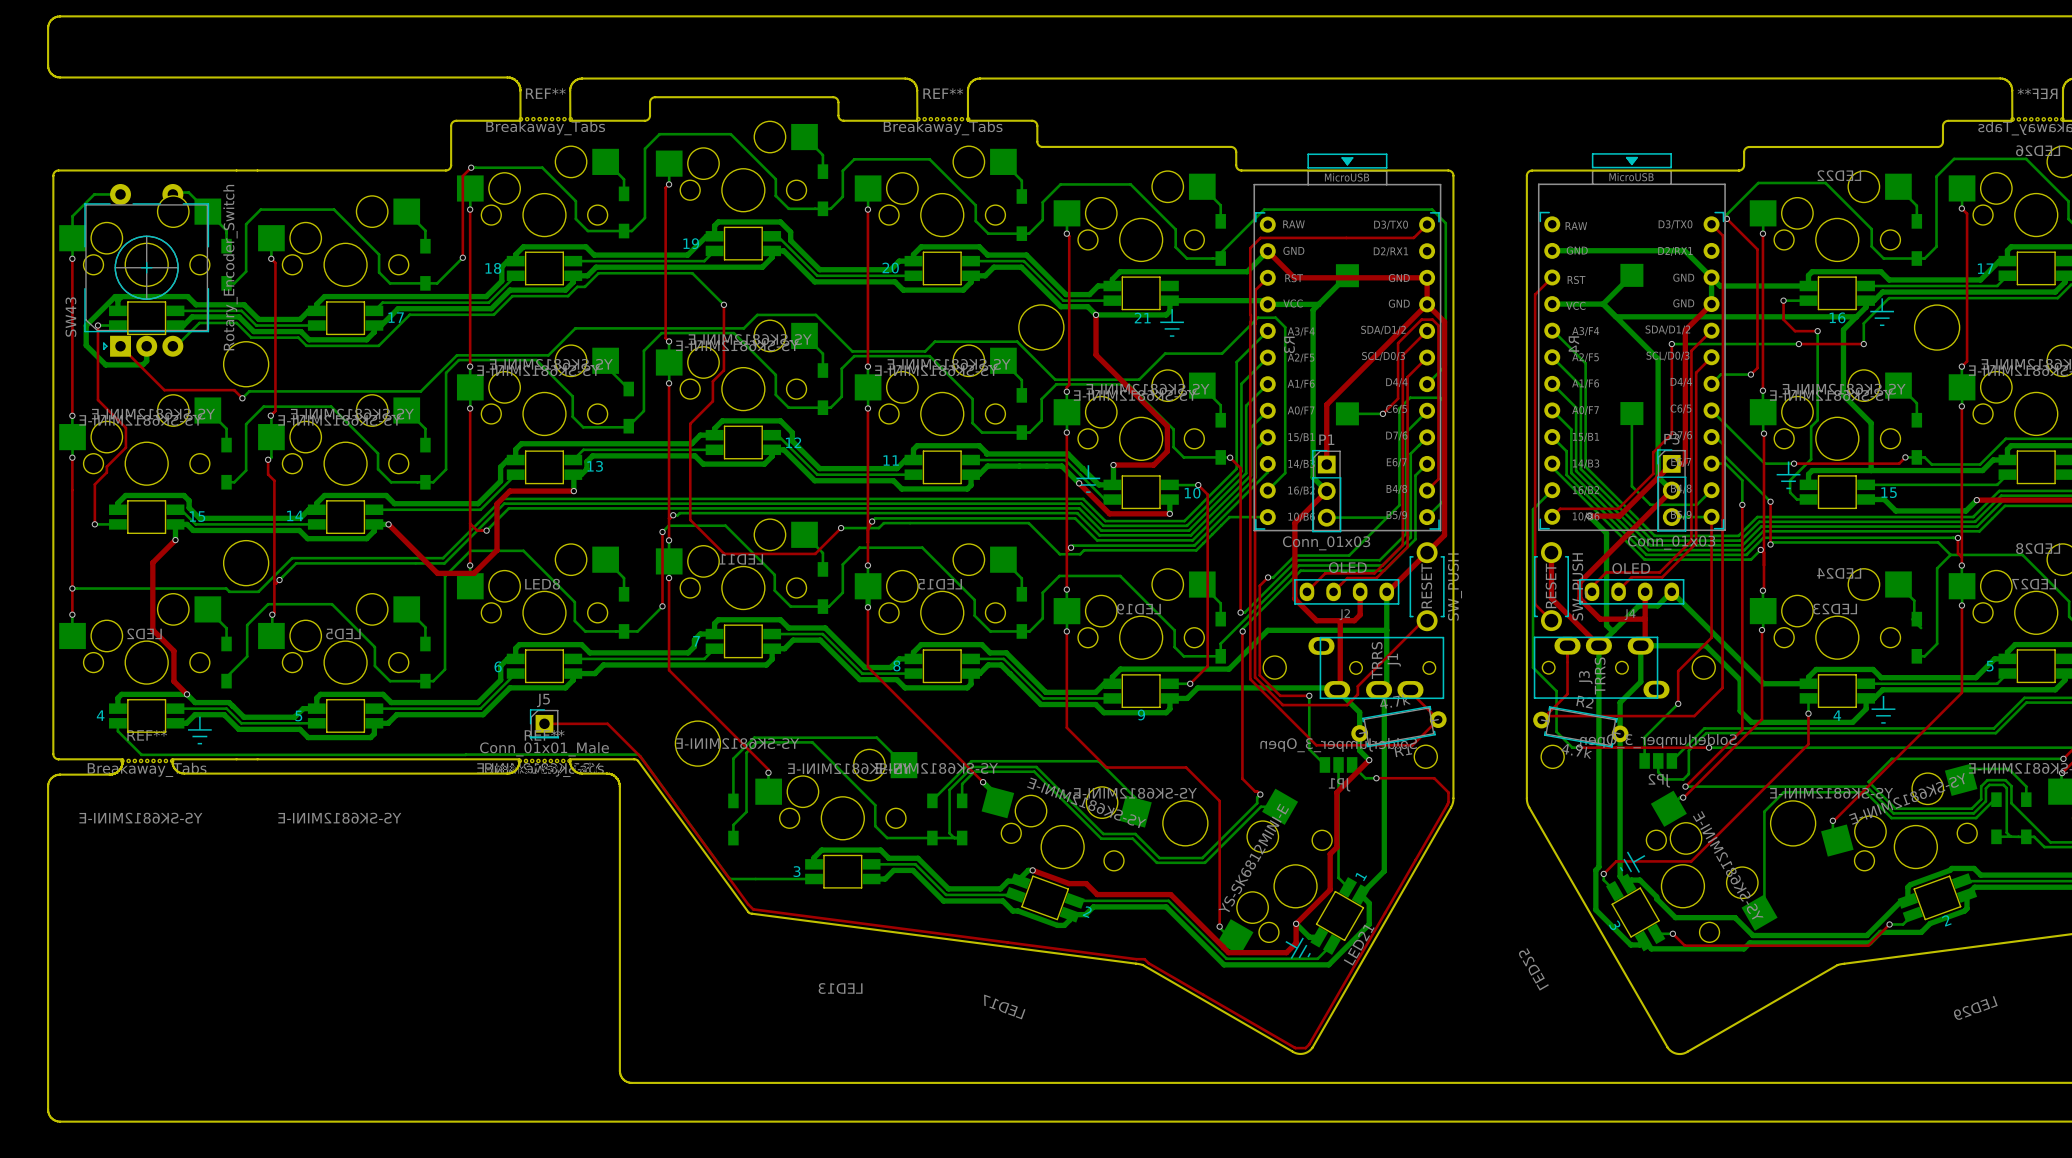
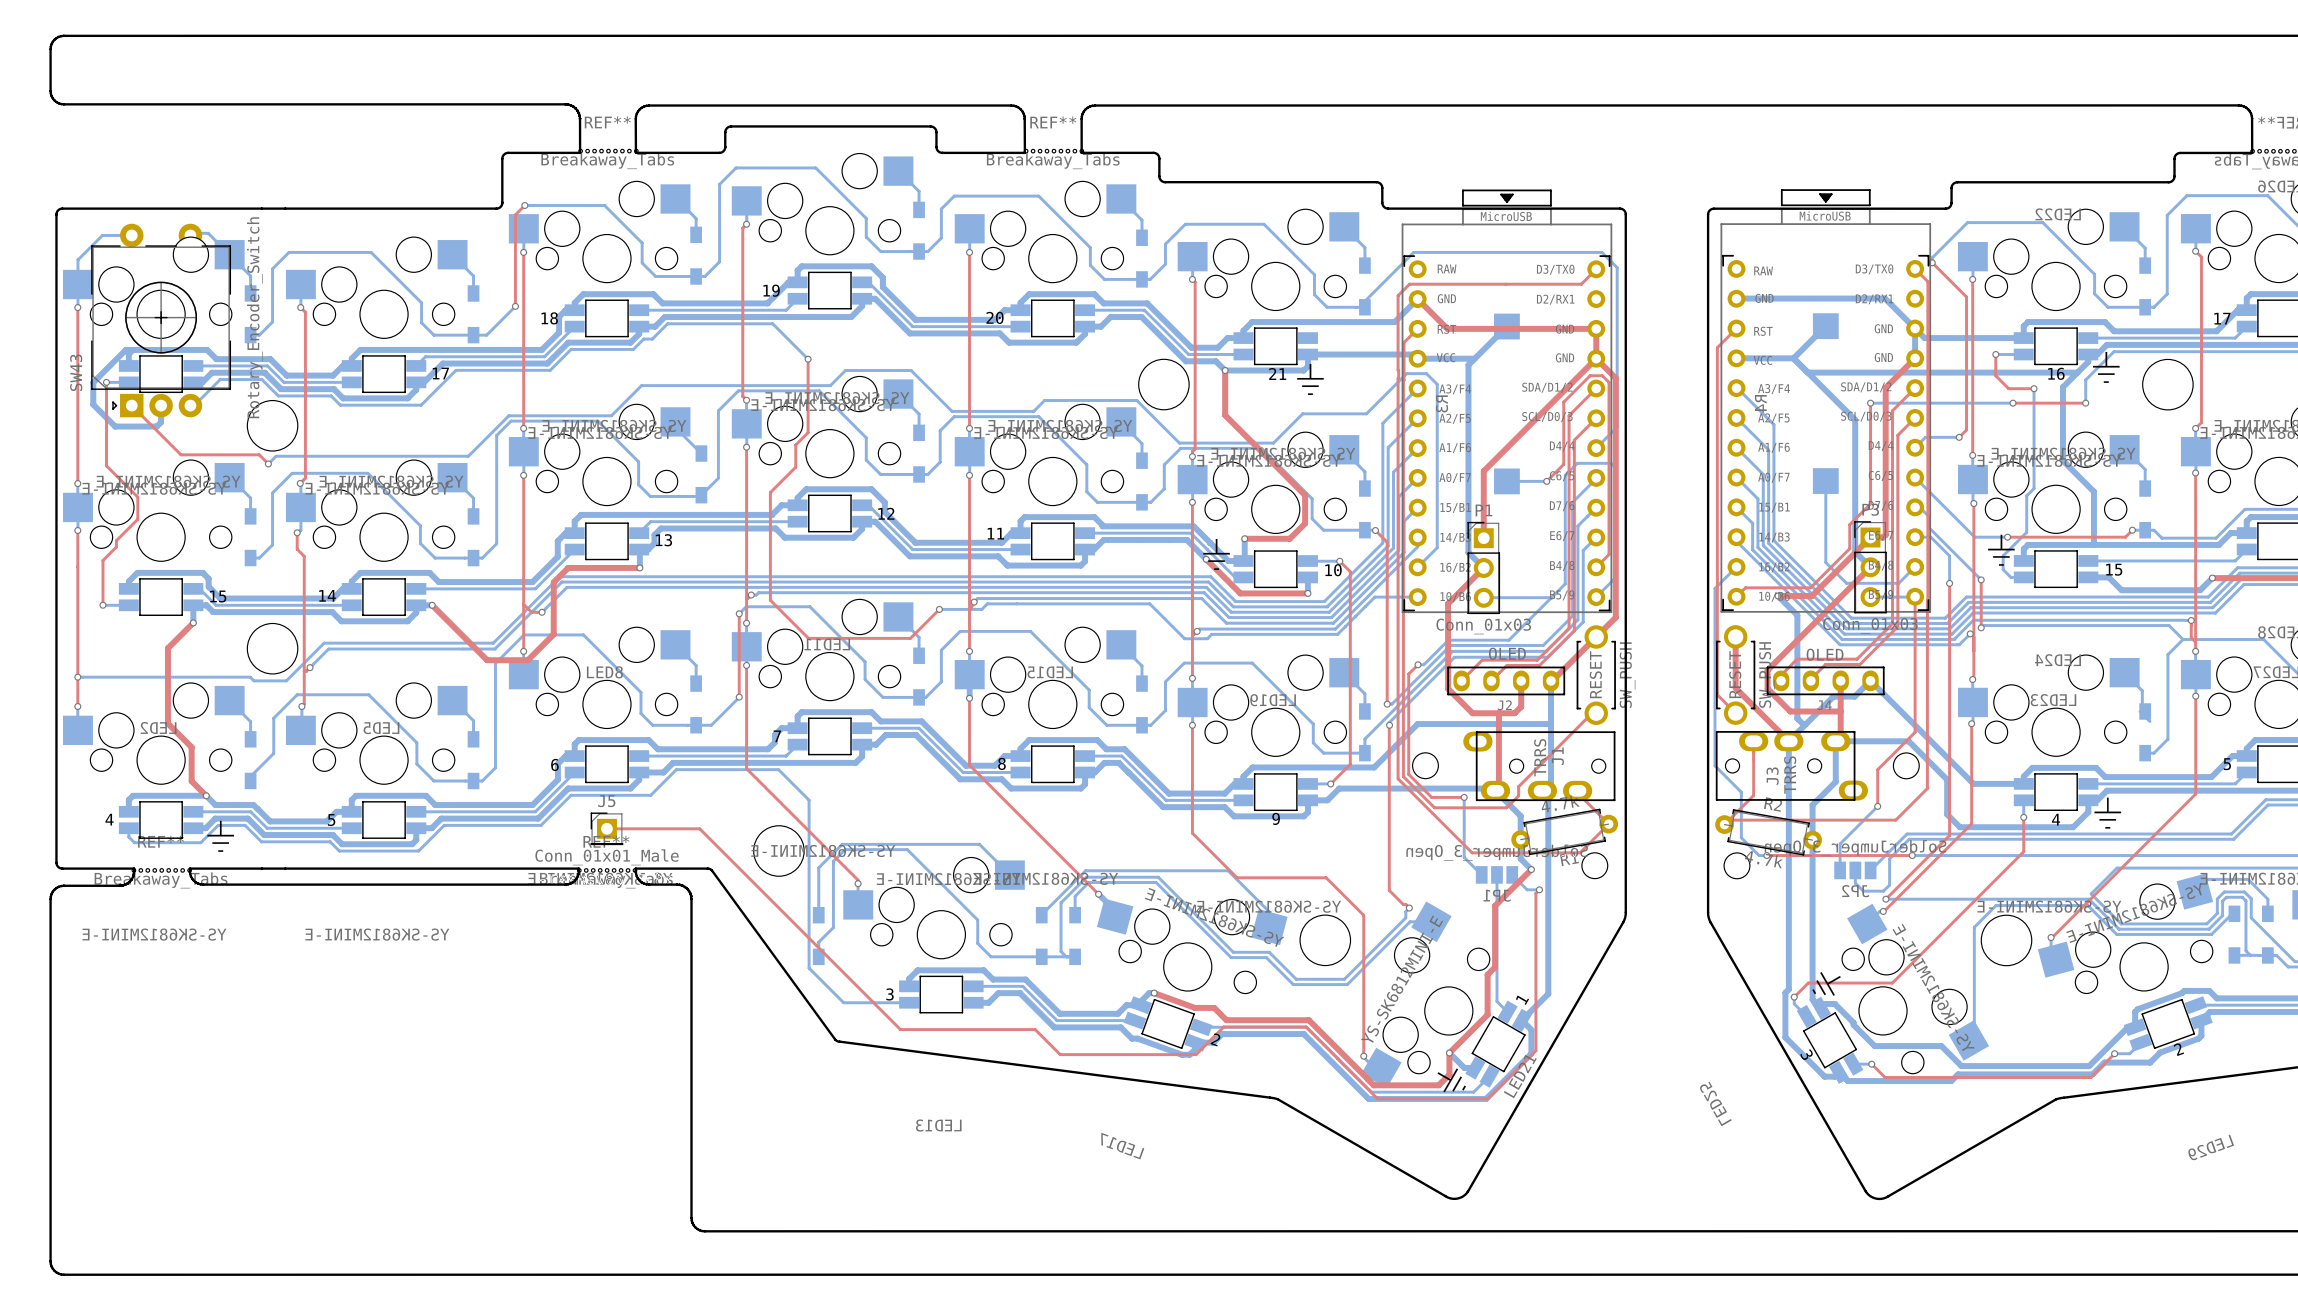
top track: (607, 723) (640, 756) (753, 909) (1144, 959) (1295, 1048) (1305, 1048) (1309, 1044) (1448, 802) (1448, 792) (1434, 778) (1376, 778) -> (677, 828) (699, 828) (900, 1029) (1035, 1029) (1060, 1054) (1196, 1054) (1223, 1026) (1306, 1026) (1377, 1098) (1487, 1098) (1535, 1050) (1535, 893) (1539, 889)
bottom track: (122, 736) (141, 754) (638, 754) (729, 878) (755, 879) -> (134, 842) (200, 842) (218, 825) (245, 825) (261, 841) (330, 841) (339, 851) (418, 851) (444, 825) (541, 825) (571, 795) (650, 795) (676, 769) (778, 769) (809, 800) (809, 968) (843, 1002)

